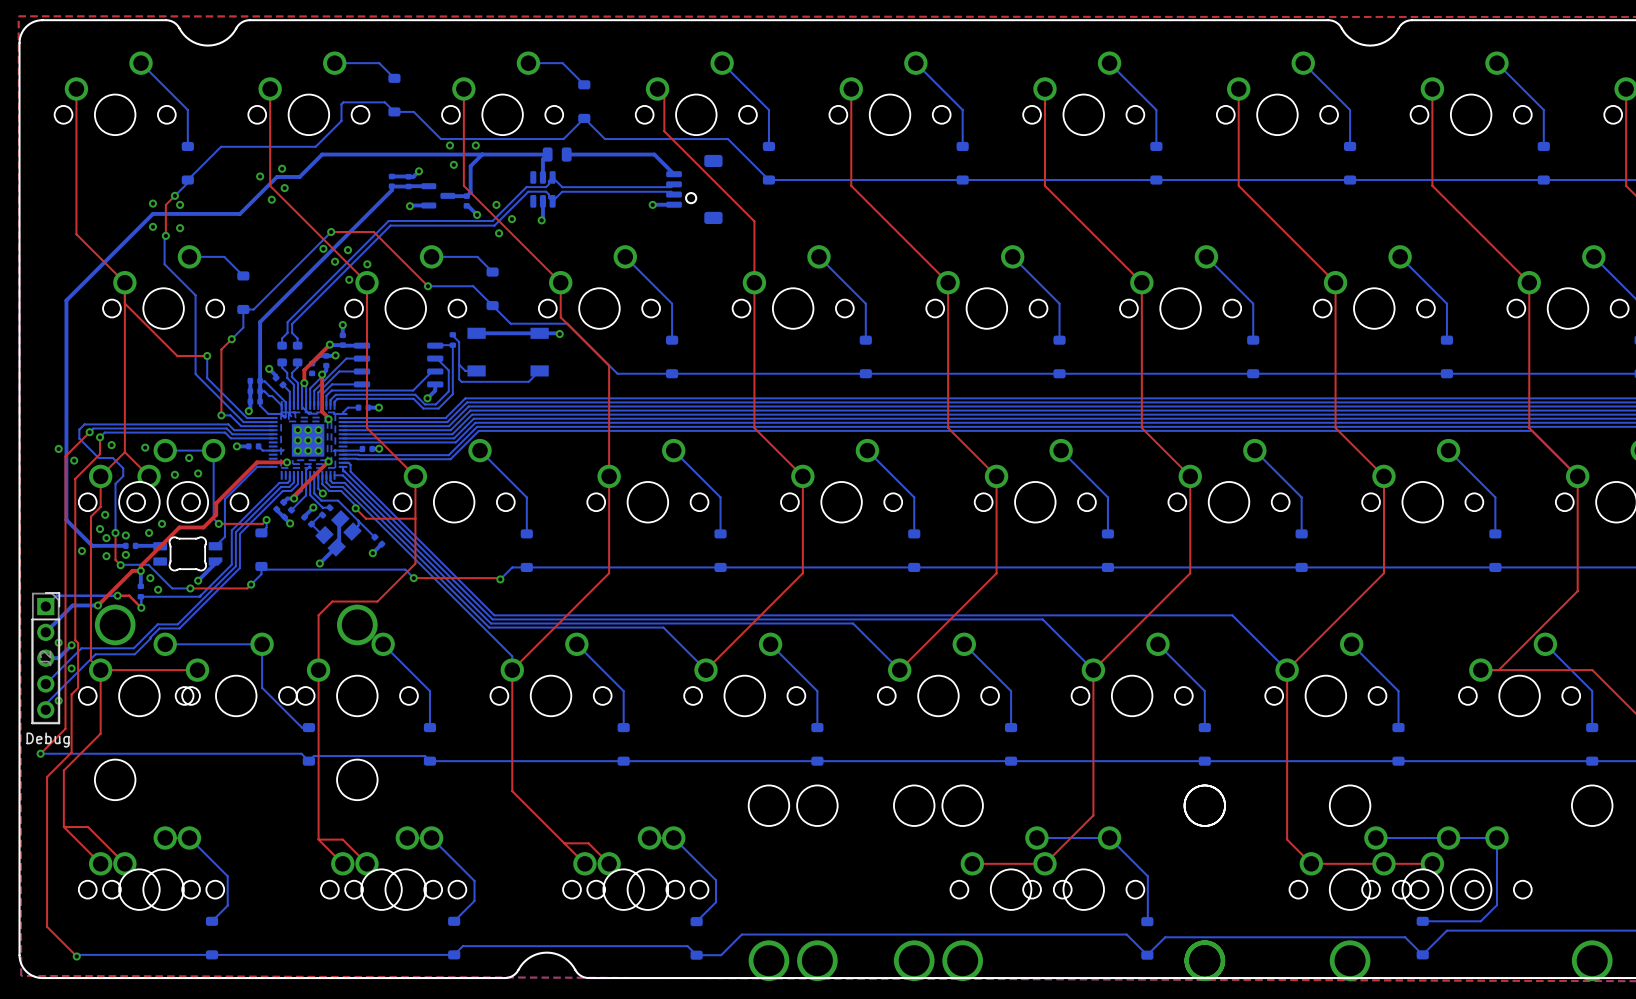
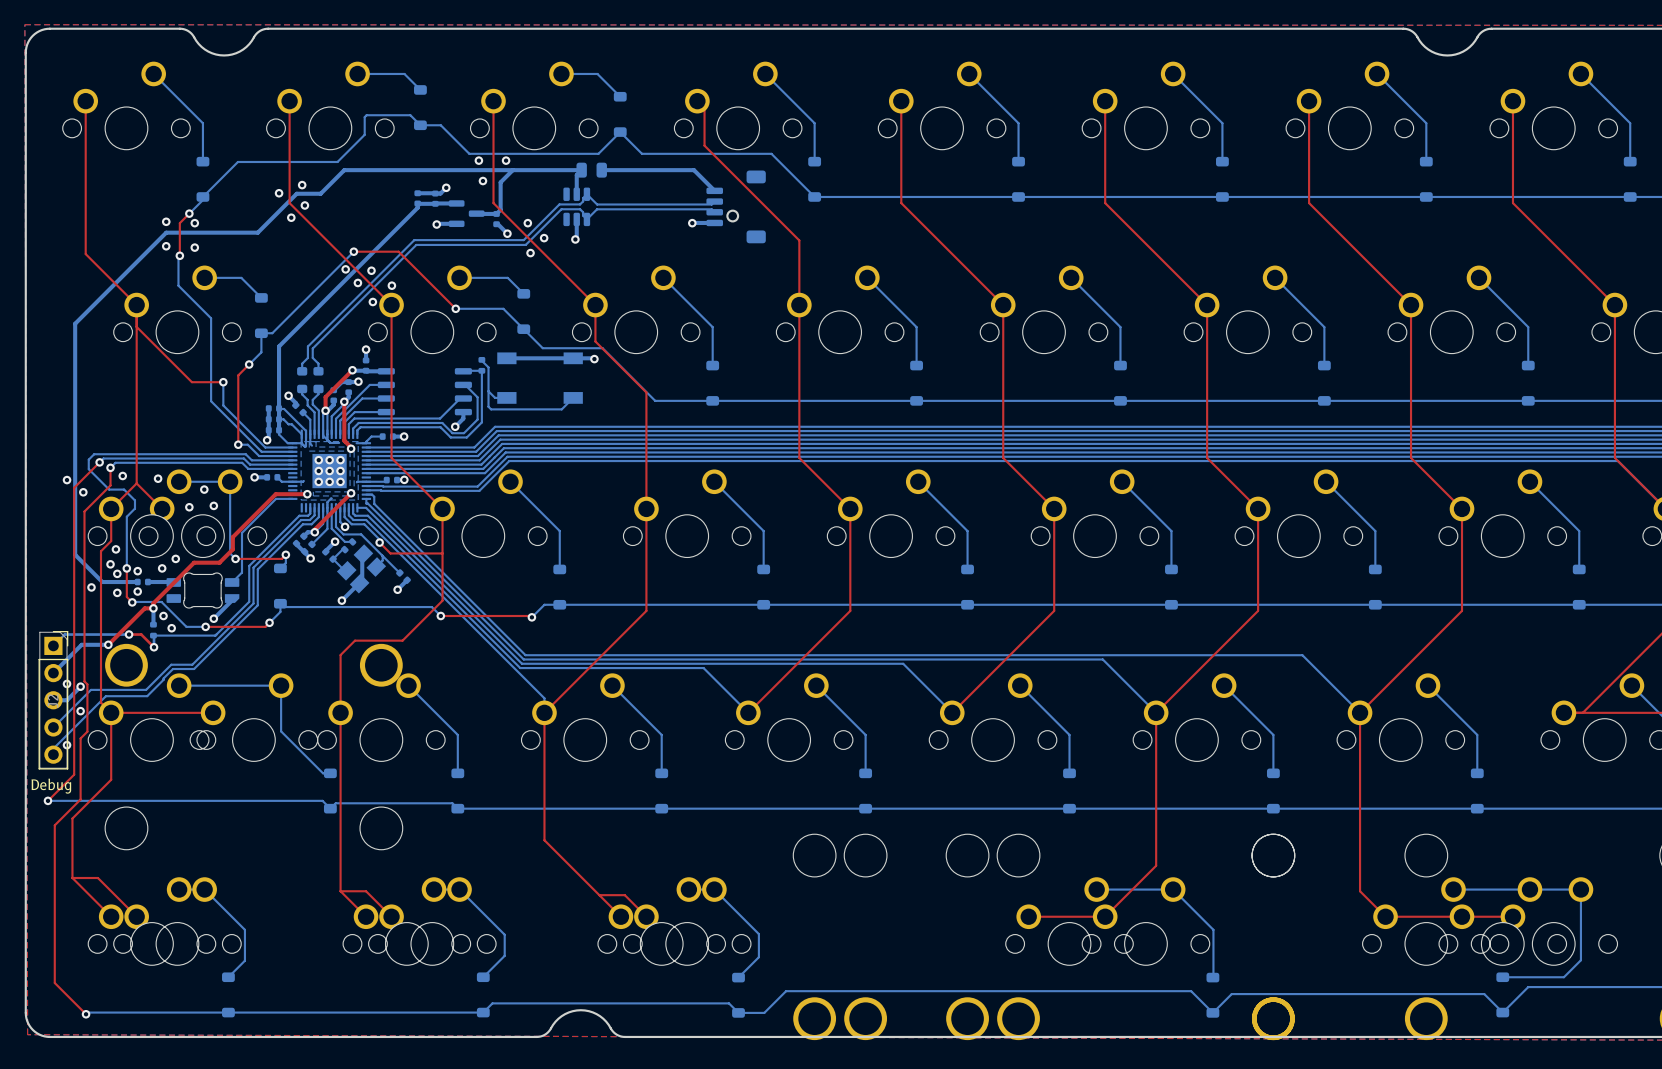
bottom track: none -> (333, 400) (333, 404) (325, 413)

